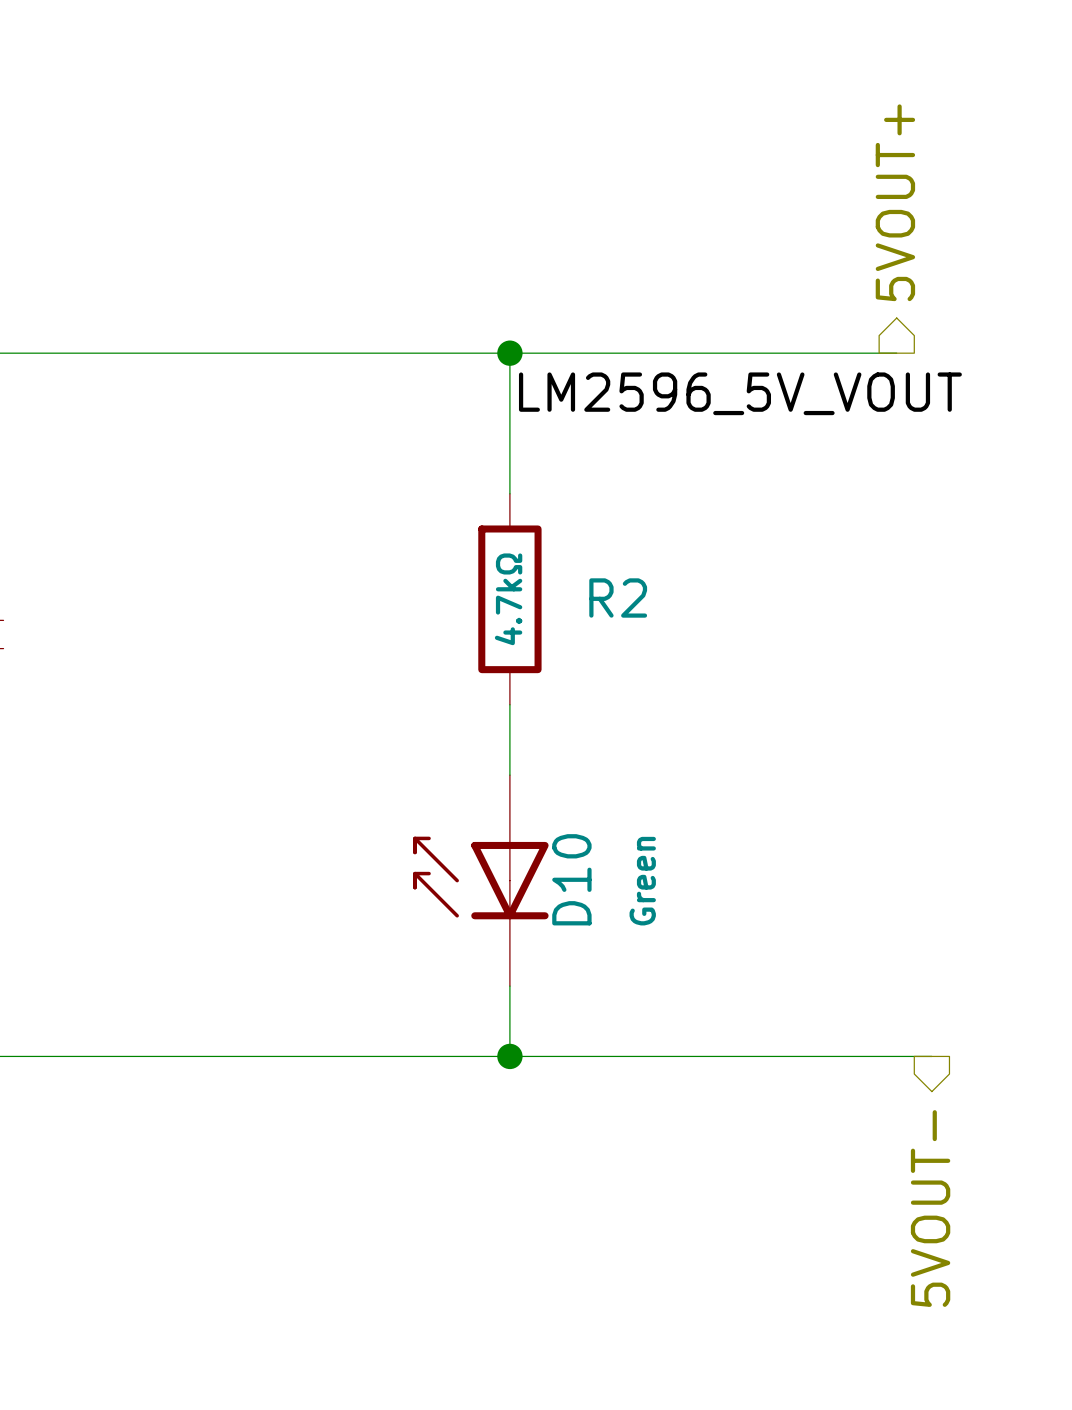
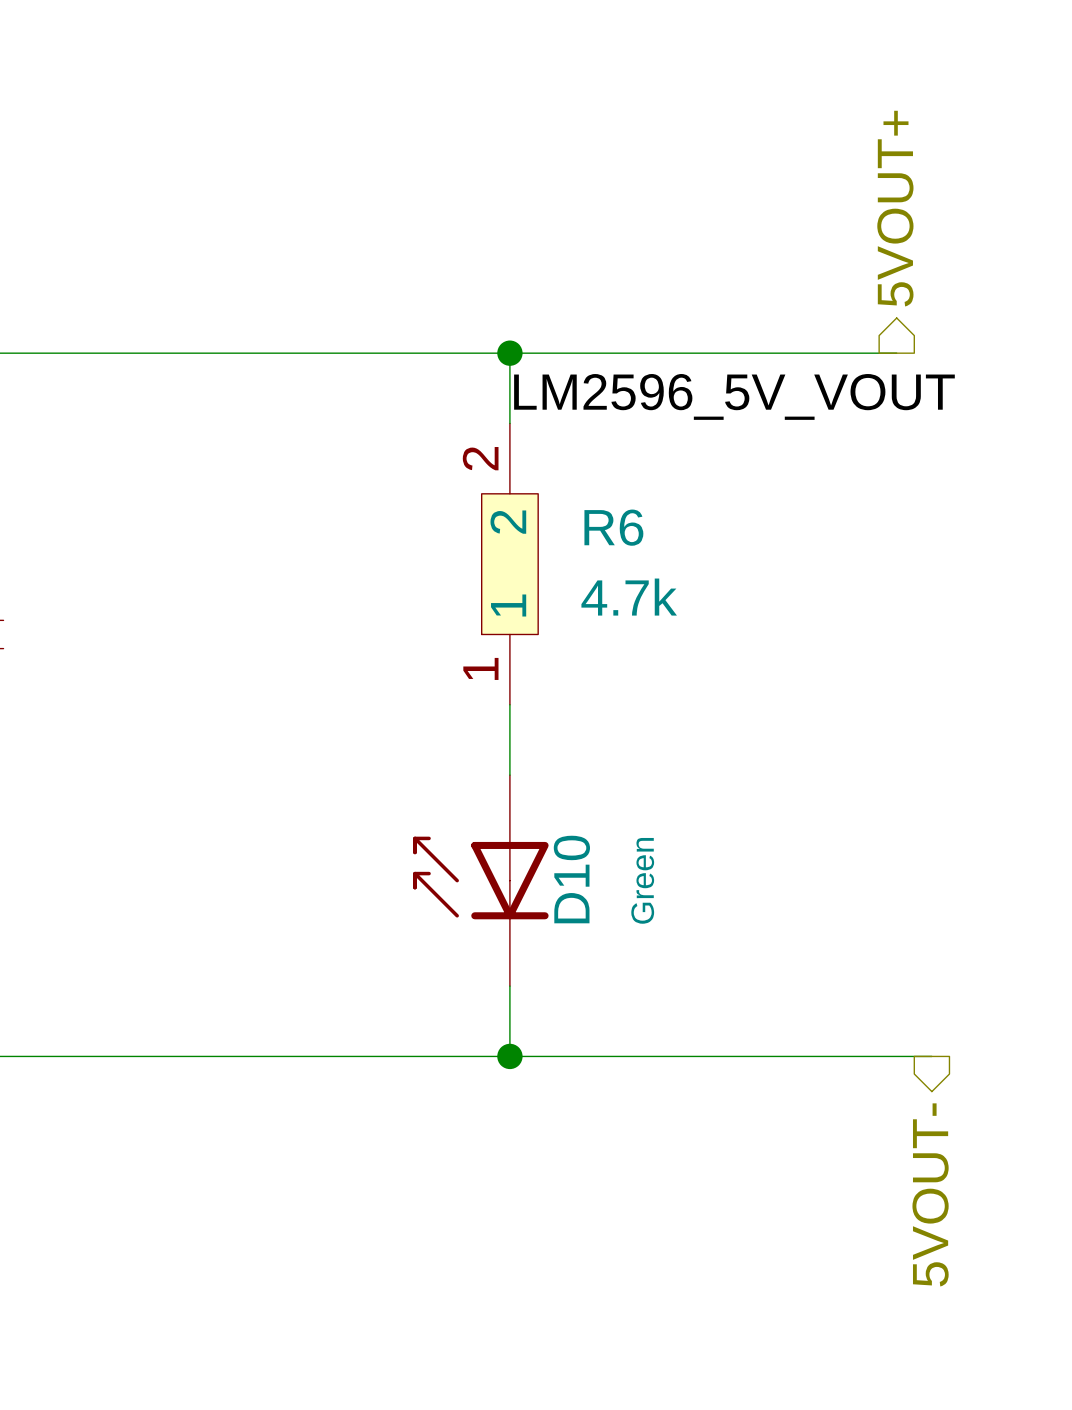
R6: none -> 4.7k (509, 564)
R2: 4.7kΩ (509, 599) -> none

